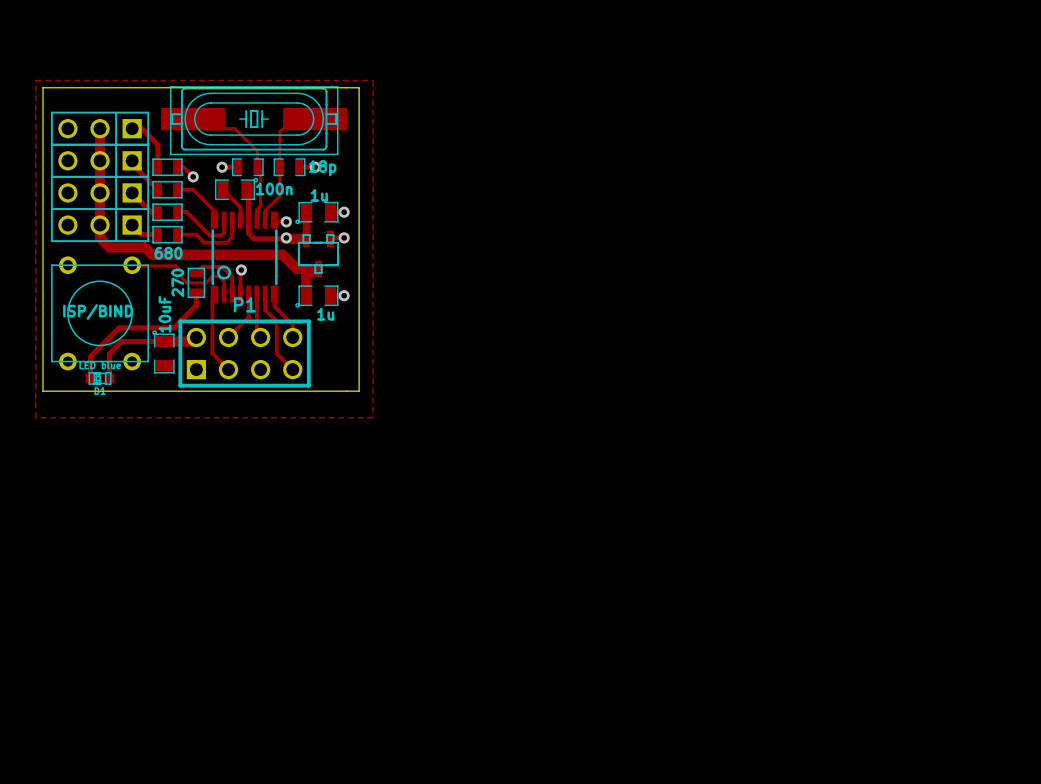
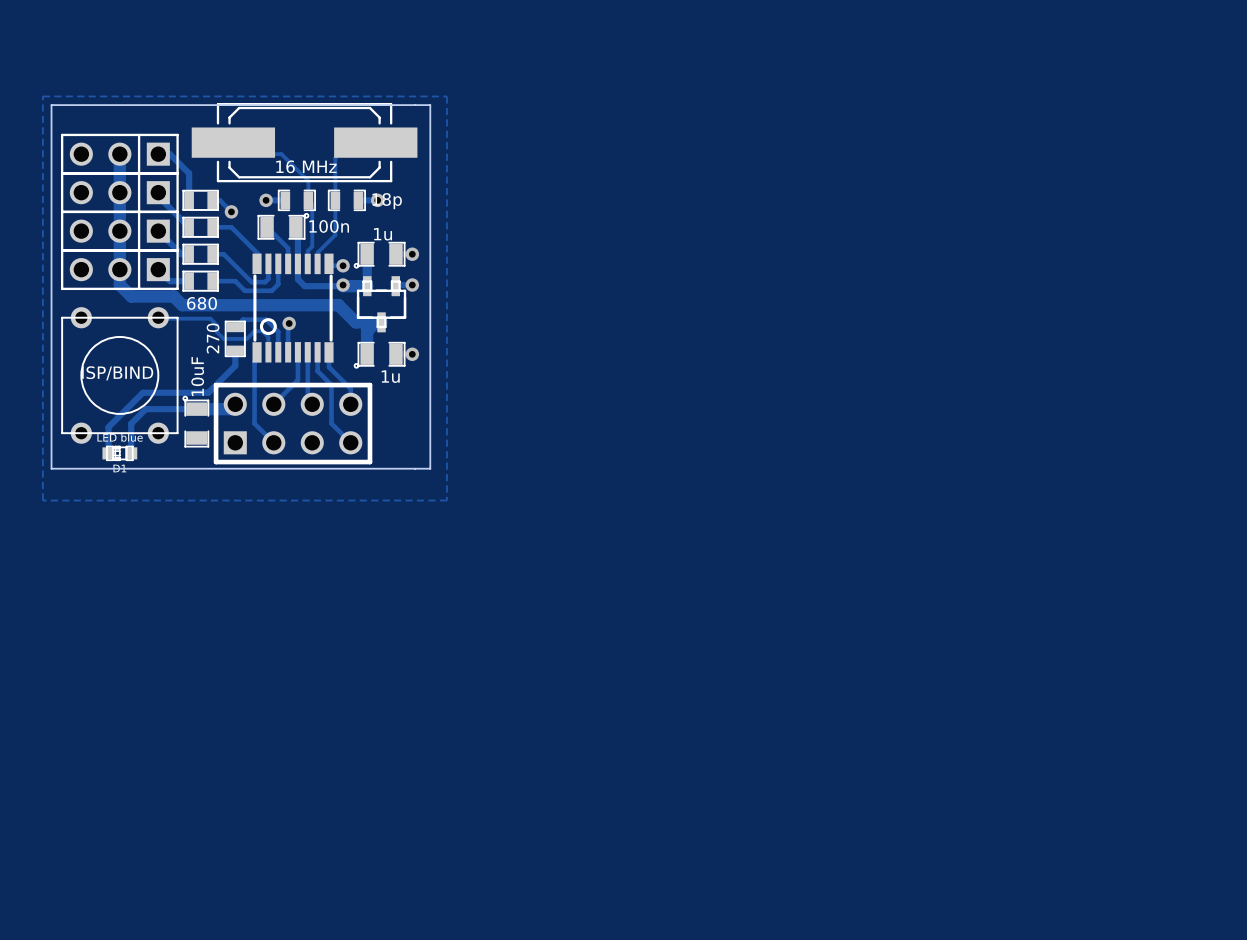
part footprint: [161, 86, 348, 155] -> [191, 103, 418, 183]
part value: none -> 16 MHz (306, 166)
P1 name: P1 (244, 304) -> none

